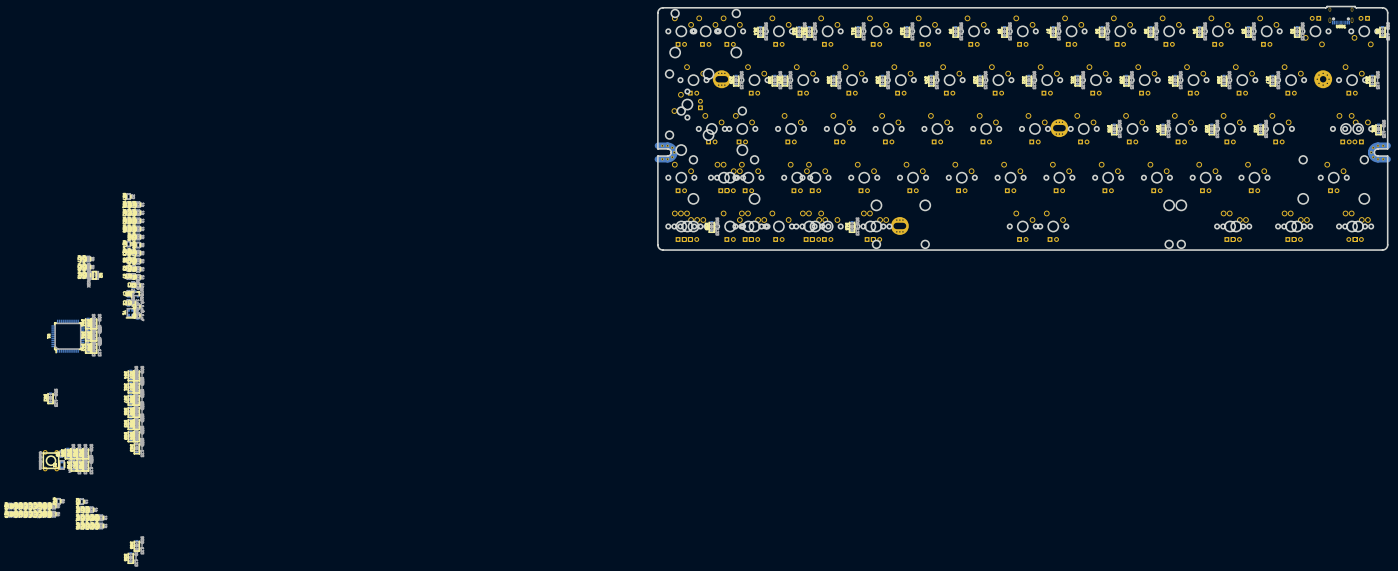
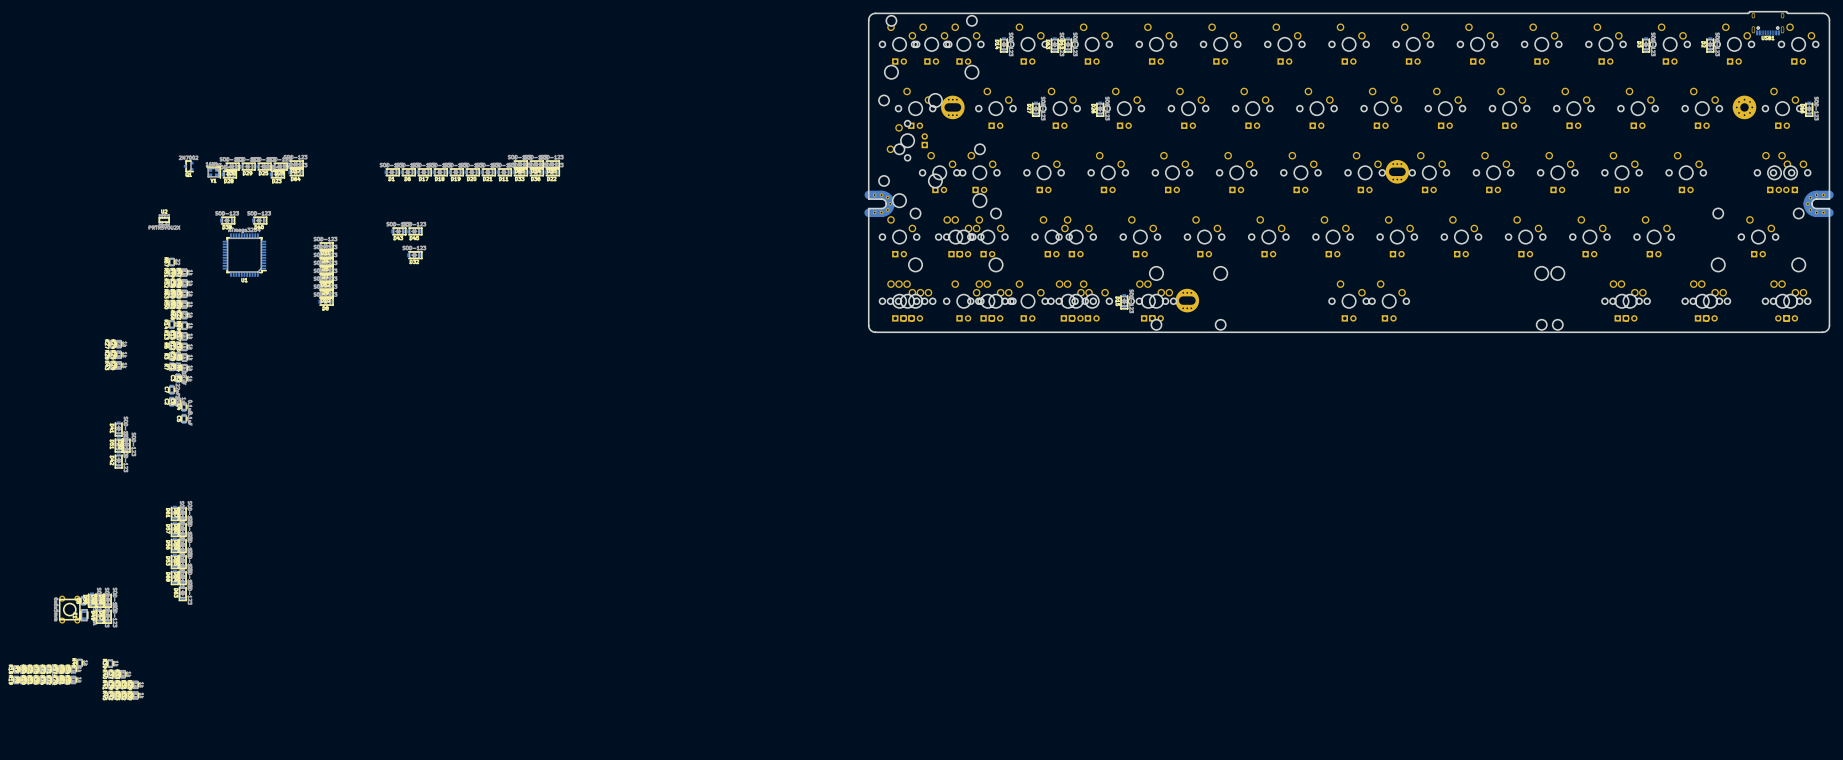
part rotation: 0° (858, 31) -> 90° counterclockwise (504, 172)
part position: (858, 31) -> (504, 172)
part rotation: 0° (906, 31) -> 90° counterclockwise (325, 293)
part position: (906, 31) -> (325, 293)
part rotation: 0° (955, 31) -> 90° counterclockwise (325, 285)
part position: (955, 31) -> (325, 285)
part rotation: 0° (1004, 31) -> 90° counterclockwise (325, 301)
part position: (1004, 31) -> (325, 301)
part rotation: 0° (1053, 31) -> 90° counterclockwise (325, 270)
part position: (1053, 31) -> (325, 270)
part rotation: 0° (1102, 31) -> 90° counterclockwise (407, 172)
part position: (1102, 31) -> (407, 172)
part rotation: 0° (1150, 31) -> 90° counterclockwise (325, 262)
part position: (1150, 31) -> (325, 262)
part rotation: 0° (1199, 31) -> 90° counterclockwise (325, 254)
part position: (1199, 31) -> (325, 254)
part rotation: 0° (1315, 31) -> 180° (1734, 44)
part rotation: 0° (1364, 31) -> 180° (1798, 44)
part rotation: 0° (1382, 31) -> 90° counterclockwise (391, 172)
part position: (1382, 31) -> (391, 172)
part rotation: 0° (736, 80) -> 90° counterclockwise (247, 166)
part position: (736, 80) -> (247, 166)
part rotation: 0° (774, 80) -> 90° counterclockwise (229, 174)
part position: (774, 80) -> (229, 174)
part rotation: 0° (882, 80) -> 90° counterclockwise (263, 166)
part position: (882, 80) -> (263, 166)
part rotation: 0° (931, 80) -> 90° counterclockwise (279, 166)
part position: (931, 80) -> (279, 166)
part rotation: 0° (980, 80) -> 90° counterclockwise (277, 174)
part position: (980, 80) -> (277, 174)
part rotation: 0° (1028, 80) -> 90° counterclockwise (552, 172)
part position: (1028, 80) -> (552, 172)
part rotation: 0° (1077, 80) -> 90° counterclockwise (488, 172)
part position: (1077, 80) -> (488, 172)
part rotation: 0° (1126, 80) -> 90° counterclockwise (472, 172)
part position: (1126, 80) -> (472, 172)
part rotation: 0° (1175, 80) -> 90° counterclockwise (456, 172)
part position: (1175, 80) -> (456, 172)
part rotation: 0° (1224, 80) -> 90° counterclockwise (440, 172)
part position: (1224, 80) -> (440, 172)
part rotation: 0° (1272, 80) -> 90° counterclockwise (424, 172)
part position: (1272, 80) -> (424, 172)
part rotation: 0° (1114, 129) -> 90° counterclockwise (552, 164)
part position: (1114, 129) -> (552, 164)
part rotation: 0° (1163, 129) -> 90° counterclockwise (536, 164)
part position: (1163, 129) -> (536, 164)
part rotation: 0° (1211, 129) -> 90° counterclockwise (520, 172)
part position: (1211, 129) -> (520, 172)
part rotation: 0° (1260, 129) -> 90° counterclockwise (414, 255)
part position: (1260, 129) -> (414, 255)
part rotation: 0° (1378, 129) -> 90° counterclockwise (325, 246)
part position: (1378, 129) -> (325, 246)
part rotation: 0° (711, 226) -> 90° counterclockwise (231, 166)
part position: (711, 226) -> (231, 166)
part rotation: 0° (94, 275) -> 90° counterclockwise (164, 219)
part position: (94, 275) -> (164, 219)
part rotation: 0° (135, 293) -> 90° counterclockwise (188, 166)
part position: (135, 293) -> (188, 166)
part rotation: 0° (130, 312) -> 90° counterclockwise (213, 172)
part position: (130, 312) -> (213, 172)
part rotation: 0° (94, 323) -> 90° counterclockwise (227, 220)
part position: (94, 323) -> (227, 220)
part rotation: 0° (67, 336) -> 90° counterclockwise (244, 255)
part position: (67, 336) -> (244, 255)
part rotation: 0° (94, 347) -> 90° counterclockwise (259, 220)
part position: (94, 347) -> (259, 220)
part rotation: 0° (130, 375) -> 90° counterclockwise (295, 172)
part position: (130, 375) -> (295, 172)
part rotation: 0° (136, 375) -> 90° counterclockwise (295, 164)
part position: (136, 375) -> (295, 164)
part rotation: 0° (50, 398) -> 90° counterclockwise (325, 278)
part position: (50, 398) -> (325, 278)
part rotation: 0° (85, 453) -> 90° counterclockwise (398, 231)
part position: (85, 453) -> (398, 231)
part rotation: 0° (85, 465) -> 90° counterclockwise (414, 231)
part position: (85, 465) -> (414, 231)
part rotation: 0° (136, 545) -> 90° counterclockwise (520, 164)
part position: (136, 545) -> (520, 164)
part rotation: 0° (130, 557) -> 90° counterclockwise (536, 172)
part position: (130, 557) -> (536, 172)

